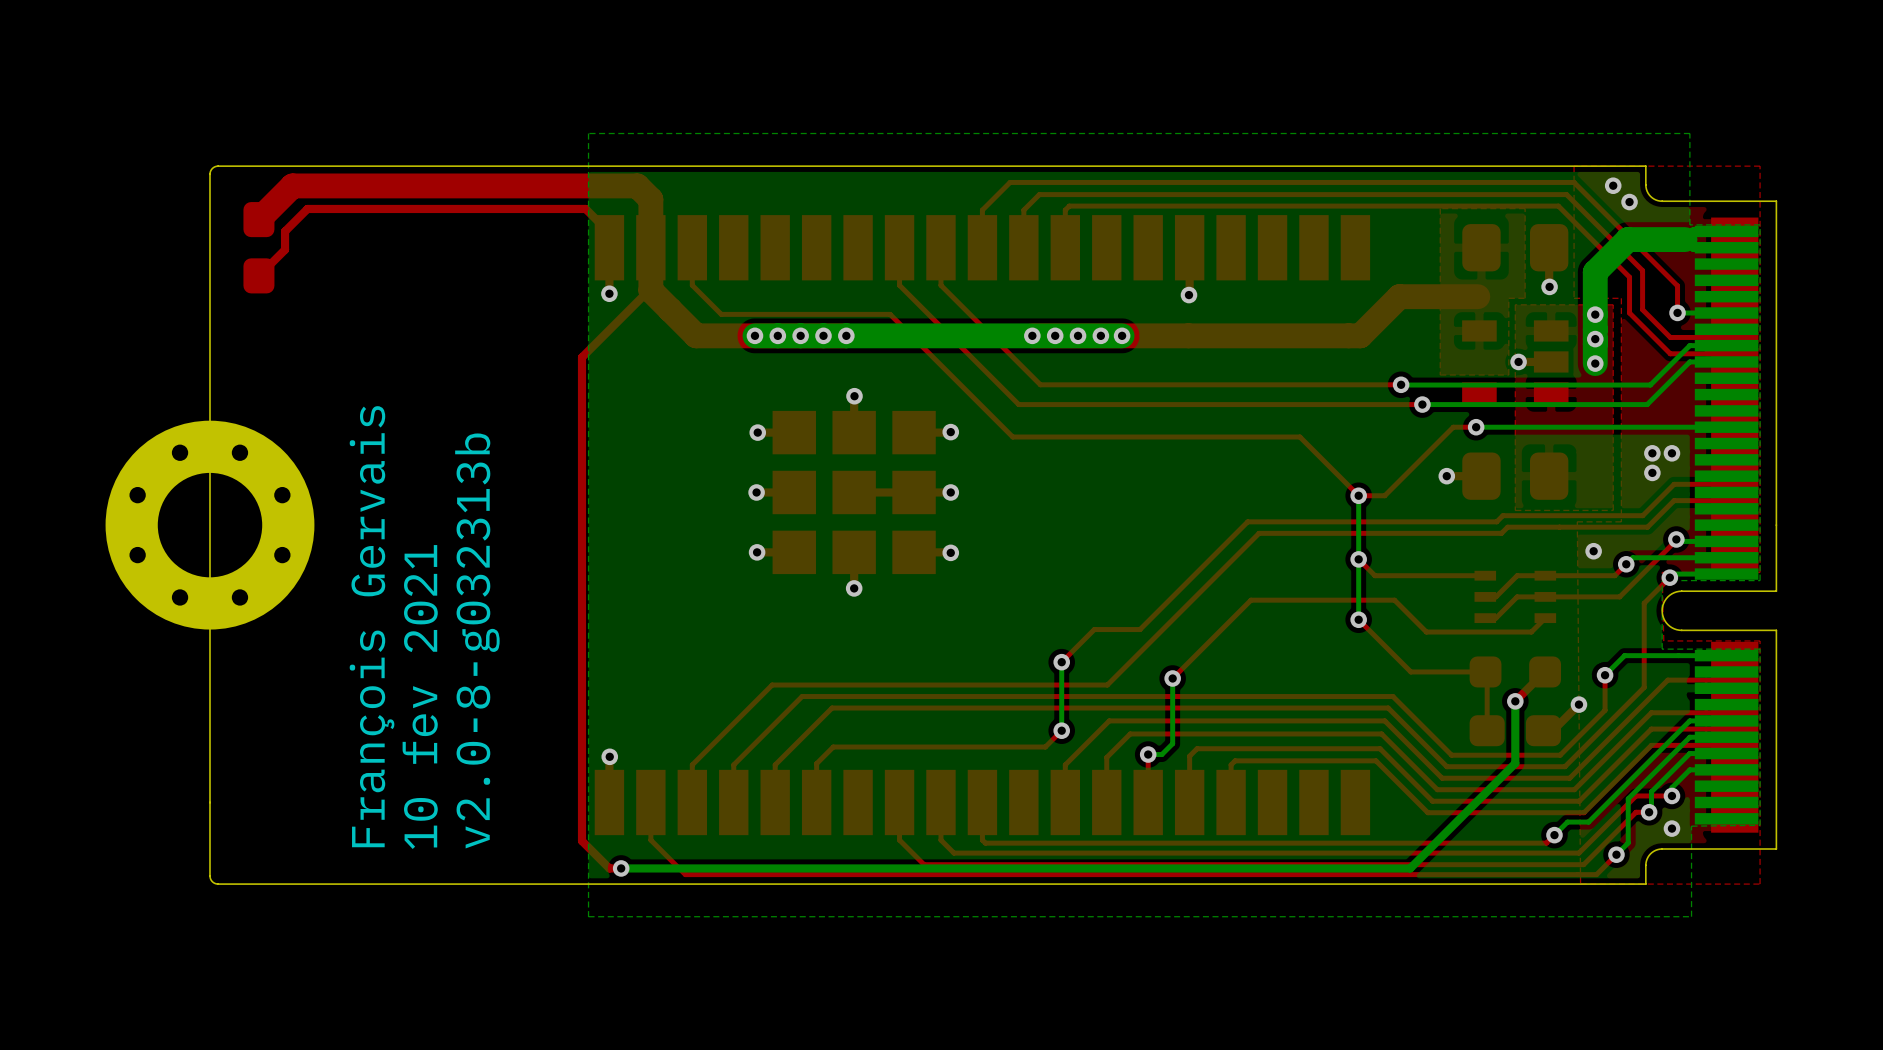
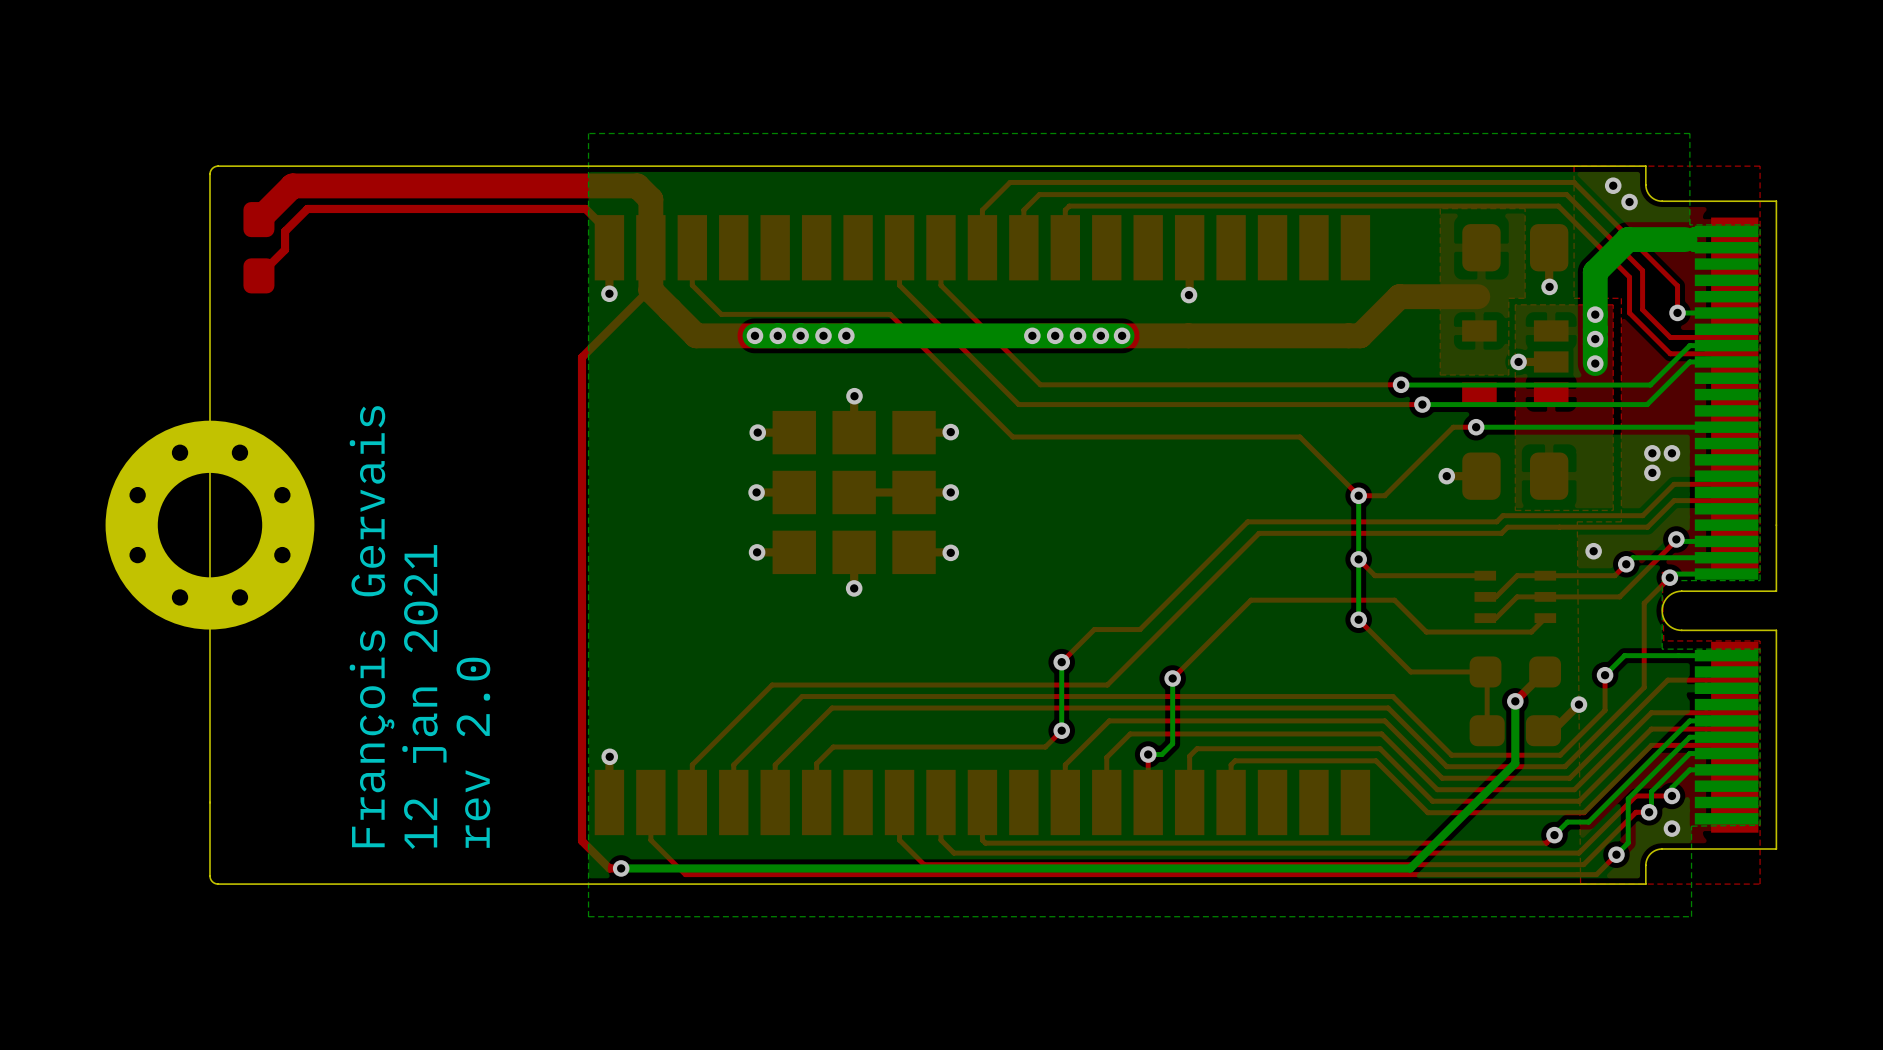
text: v2.0-8-g032313b (477, 640) -> rev 2.0 (473, 752)
text: 10 fev 2021 (420, 697) -> 12 jan 2021 (424, 697)

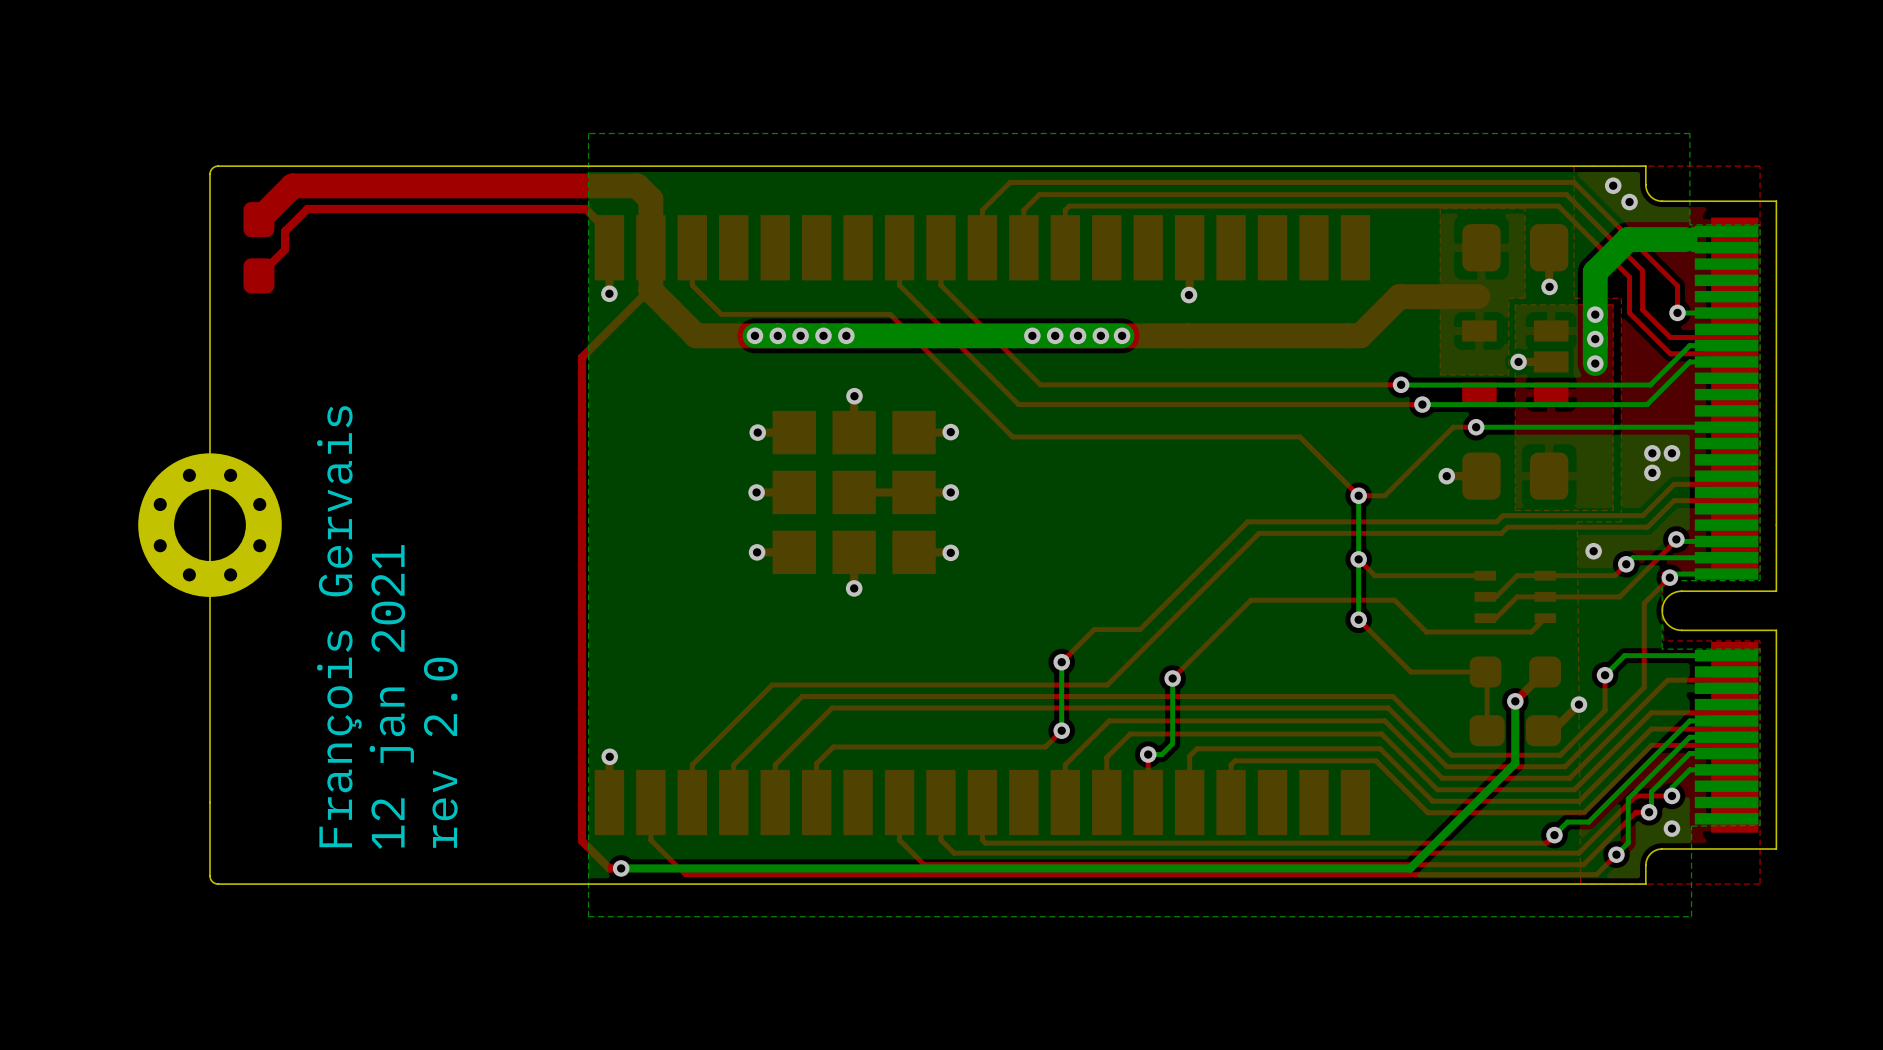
part footprint: [105, 420, 315, 630] -> [138, 453, 282, 597]
text position: François Gervais (372, 626) -> François Gervais (339, 626)
text position: 12 jan 2021 (424, 697) -> 12 jan 2021 (391, 697)
text position: rev 2.0 (473, 752) -> rev 2.0 (440, 752)

